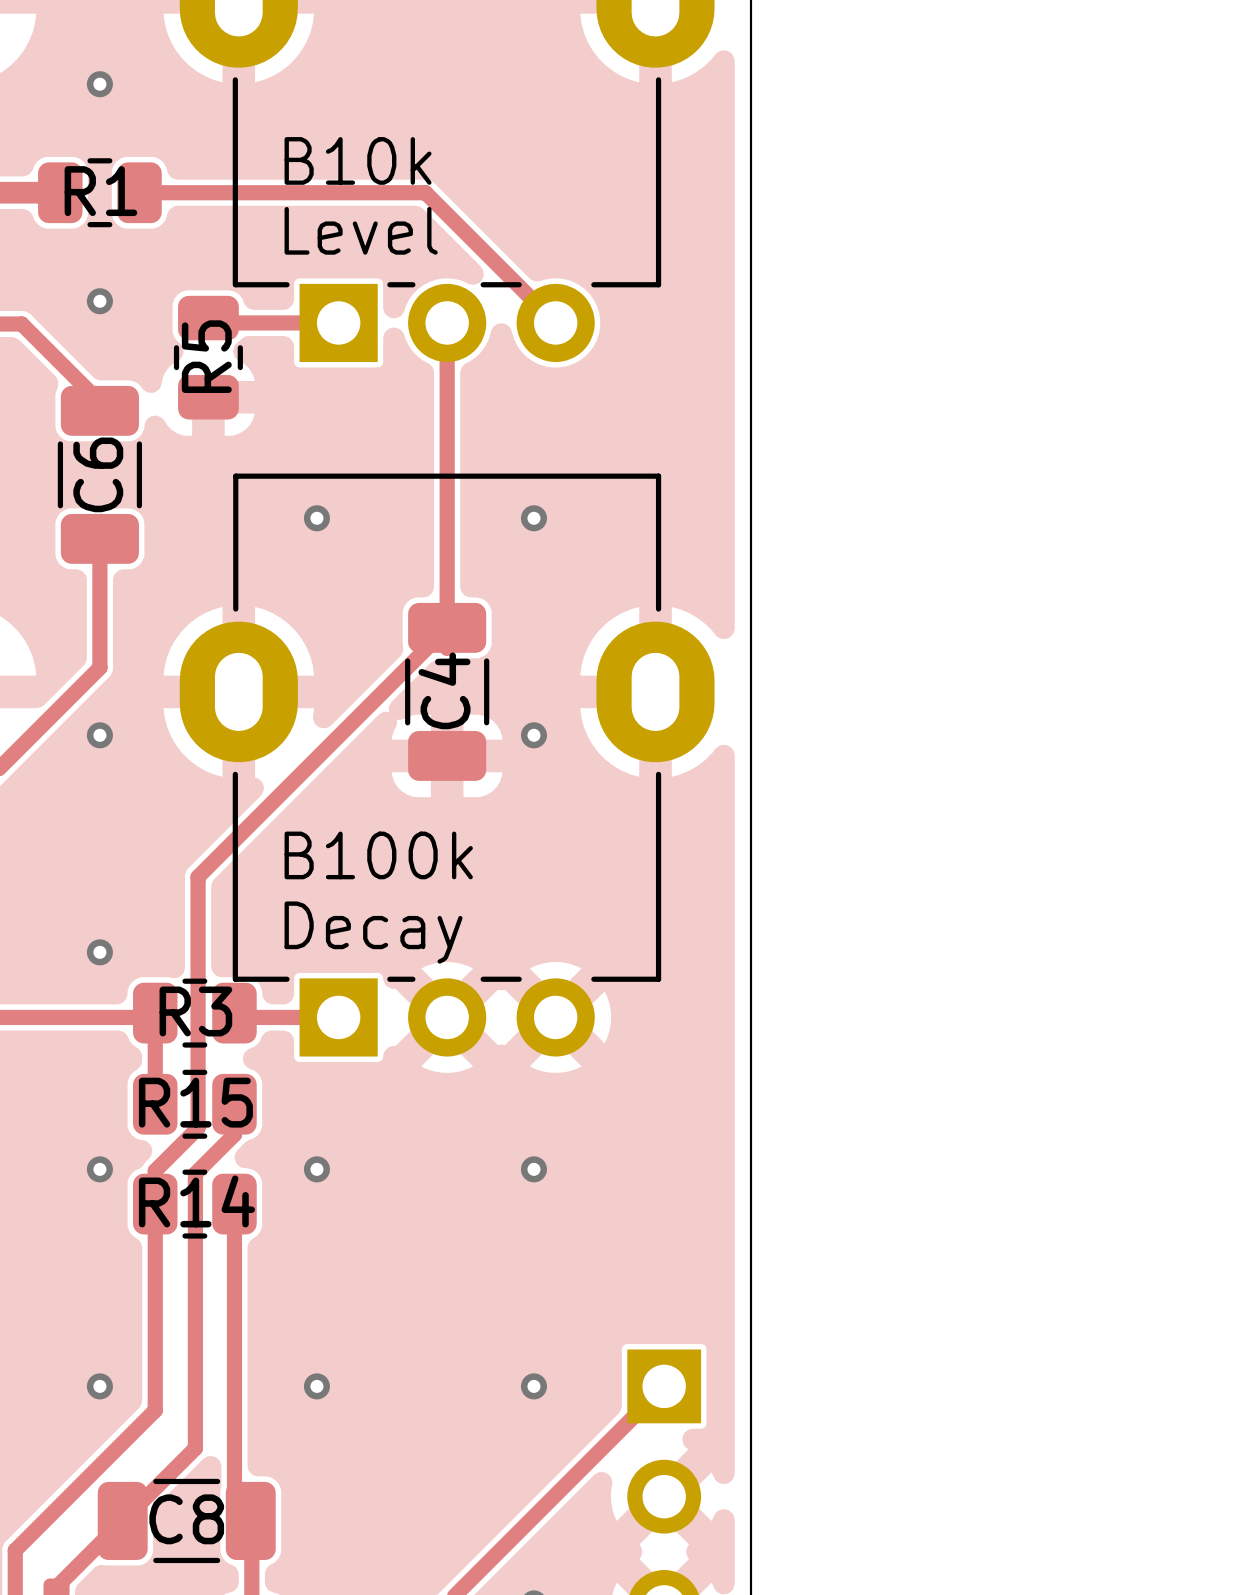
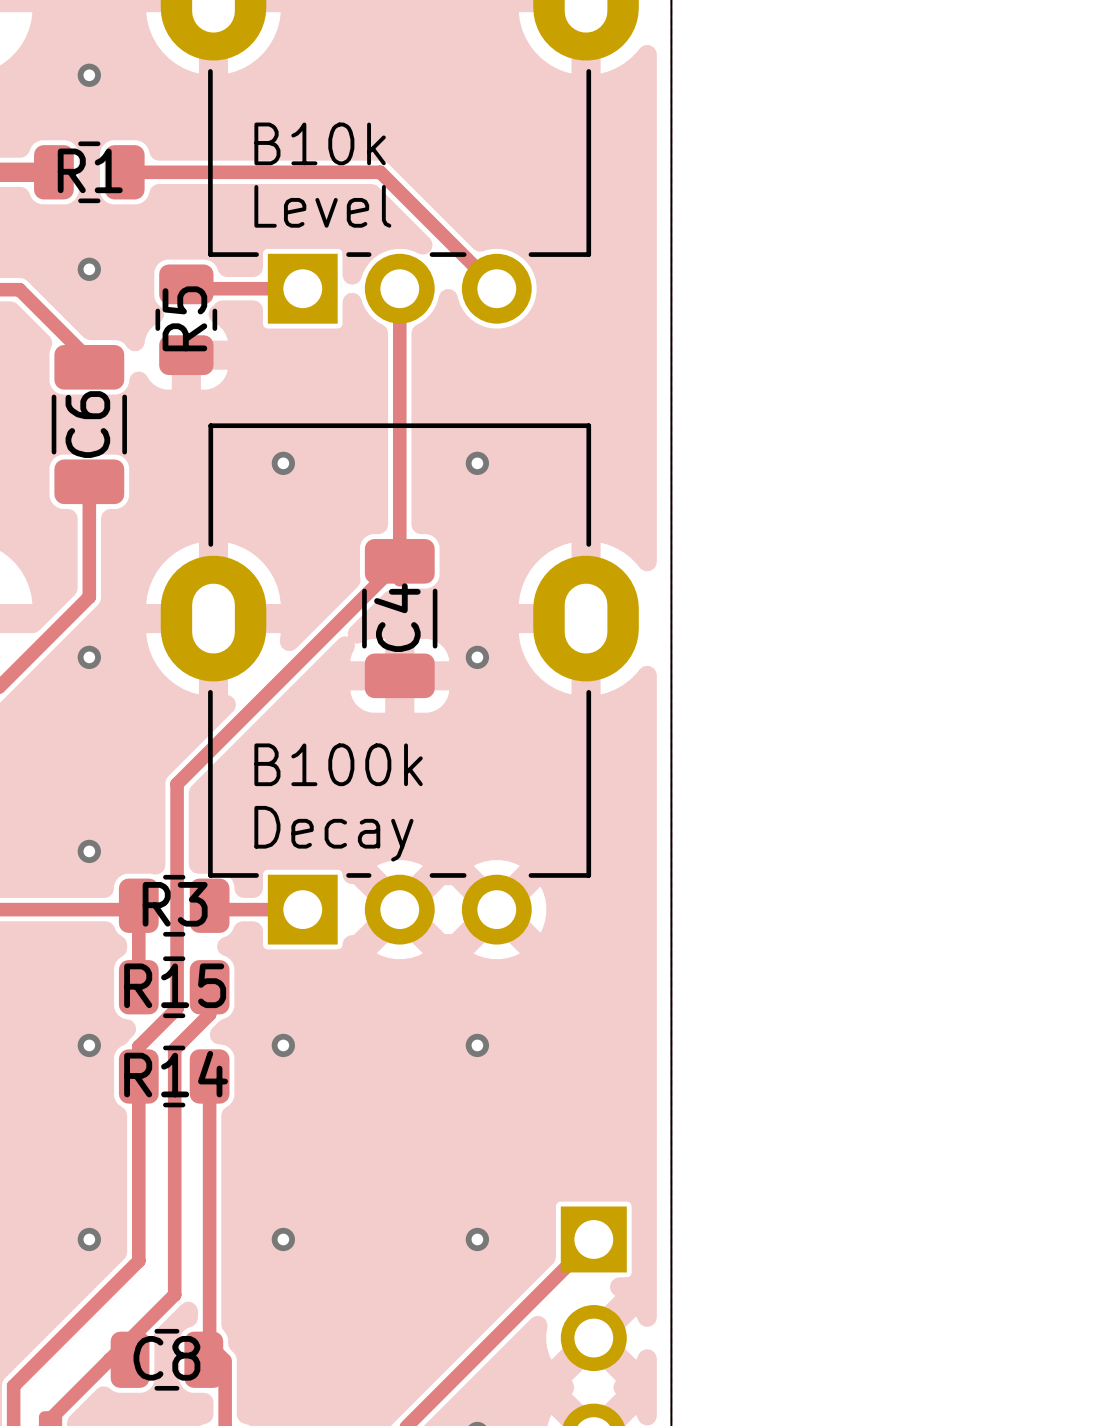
C8 footprint: [97, 1478, 276, 1564] -> [110, 1328, 224, 1391]

